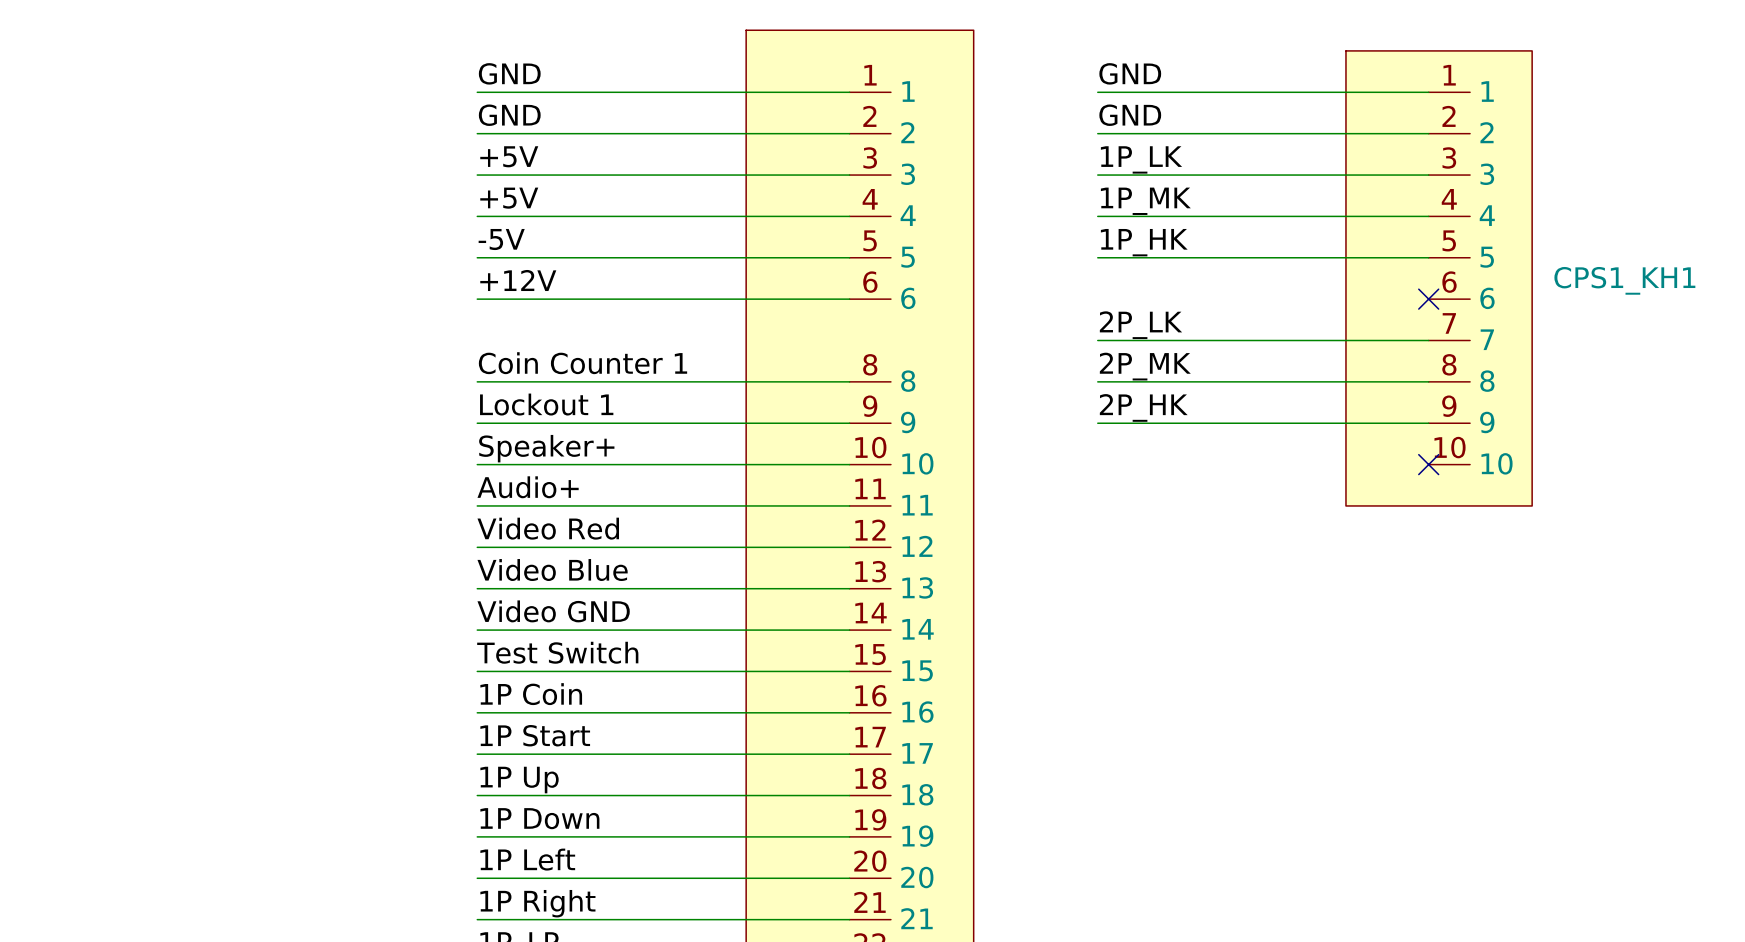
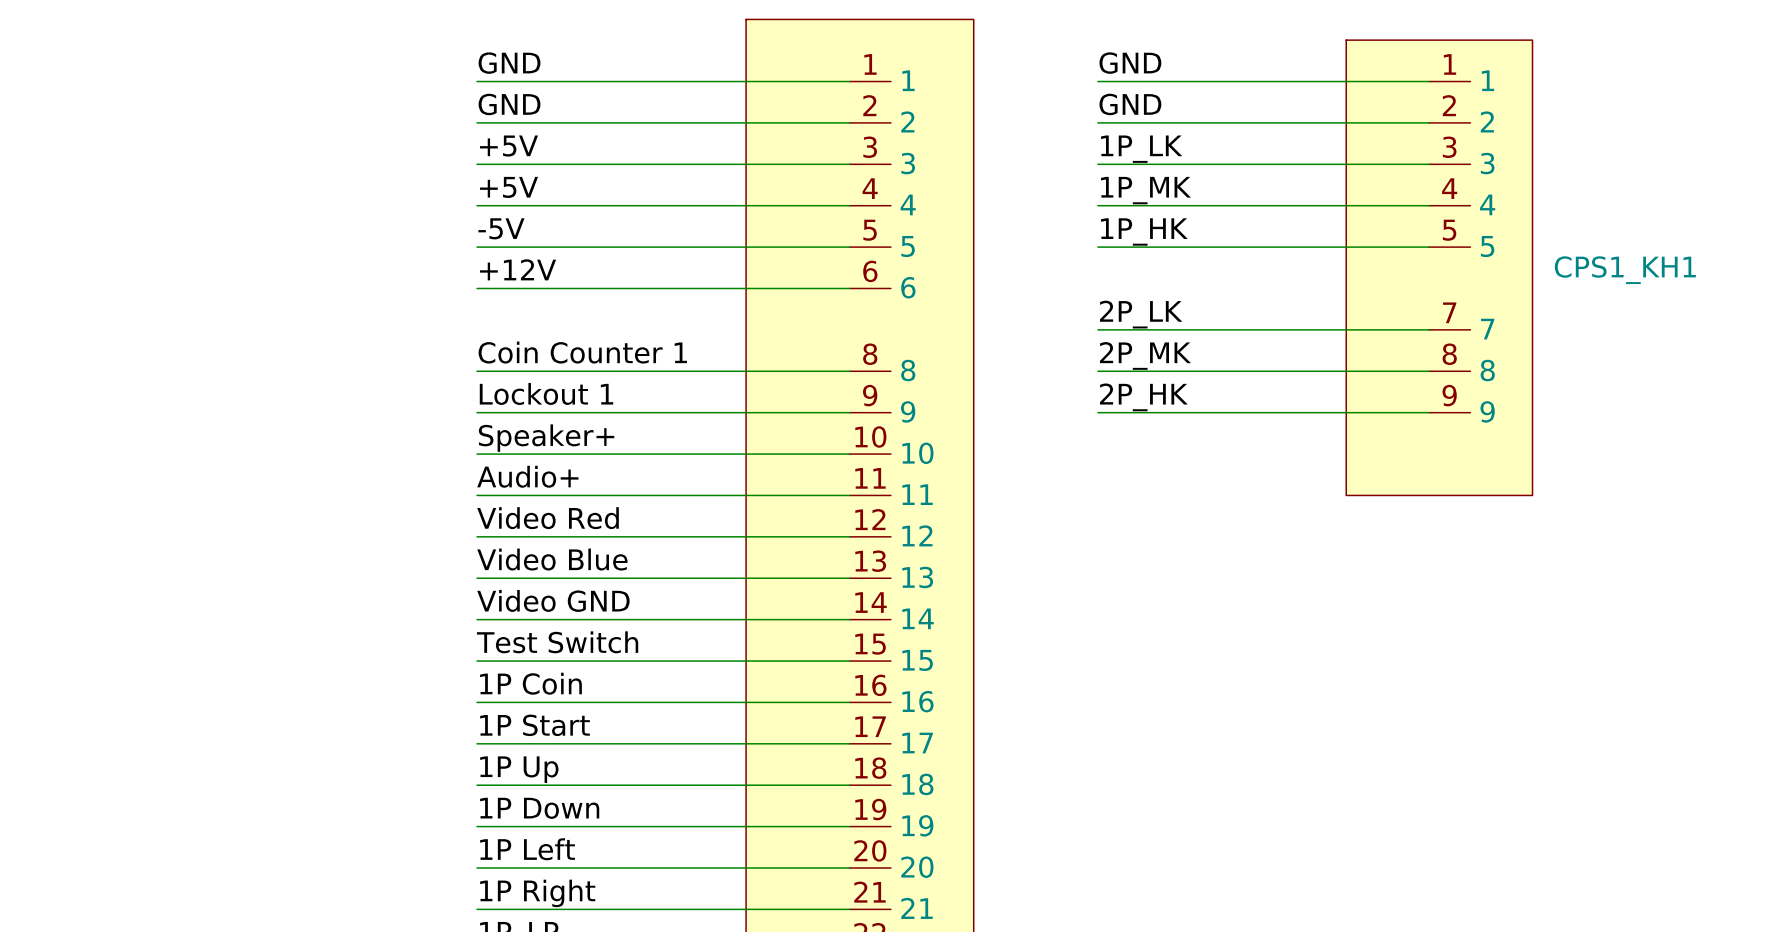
CPS1_KH1 symbol: [1345, 50, 1533, 506] -> [1346, 40, 1533, 496]
no-connect mark: (1428, 299) -> none
no-connect mark: (1428, 464) -> none

